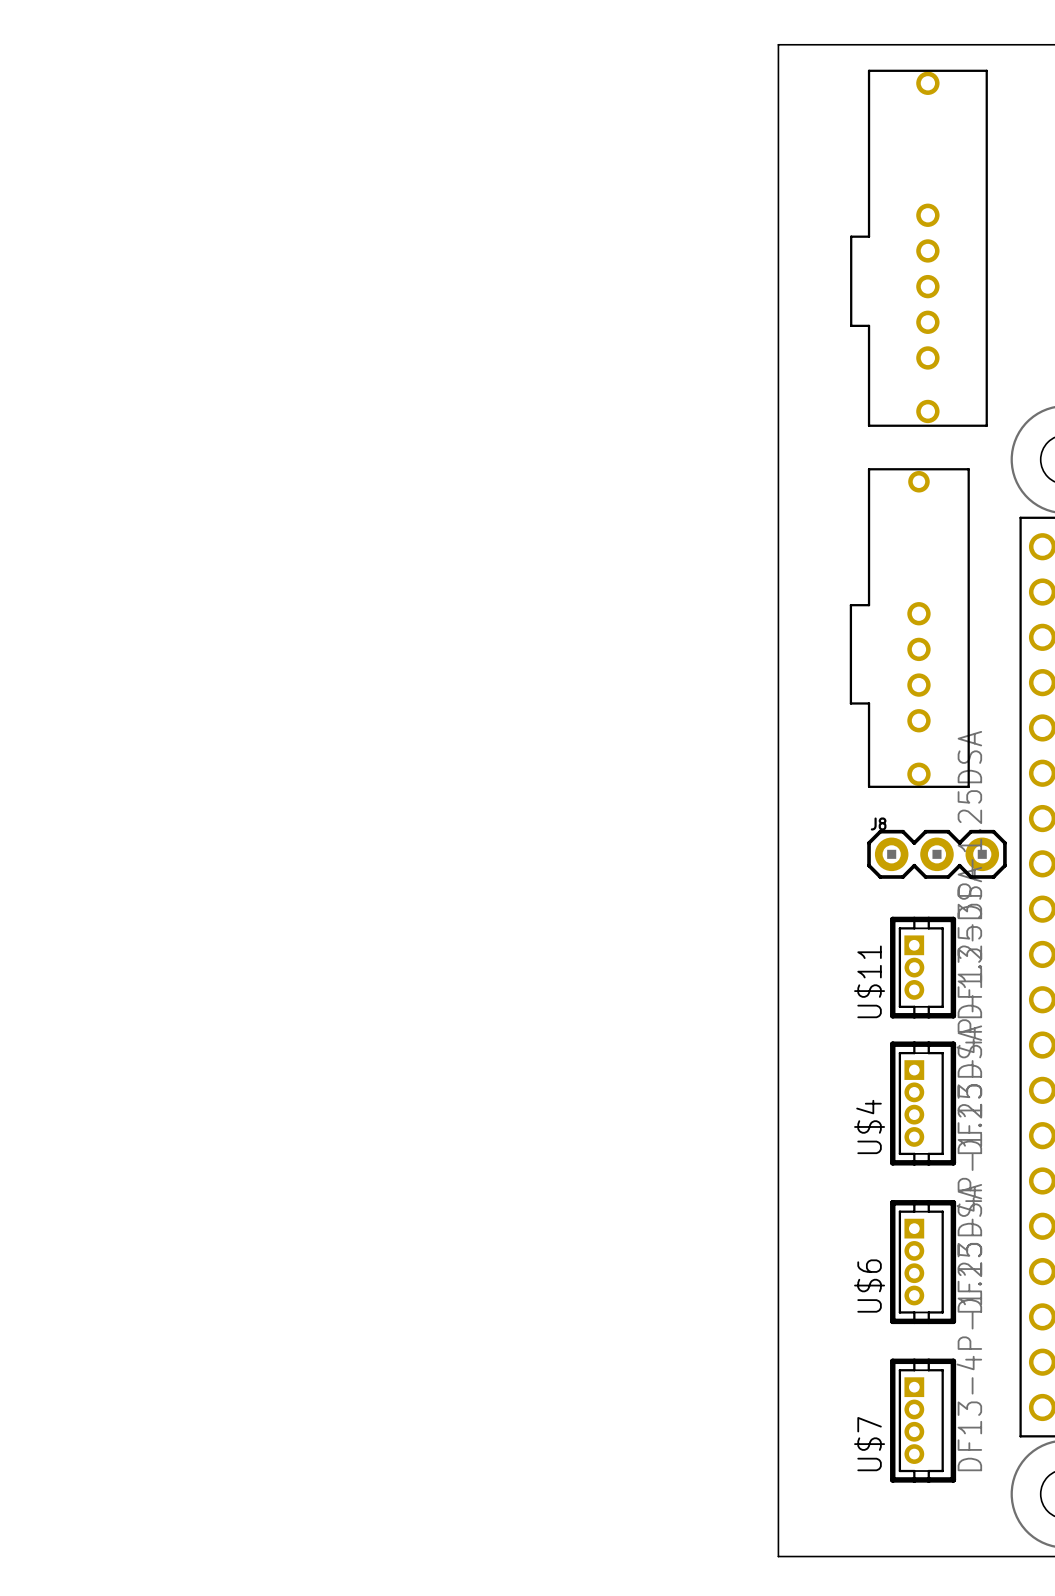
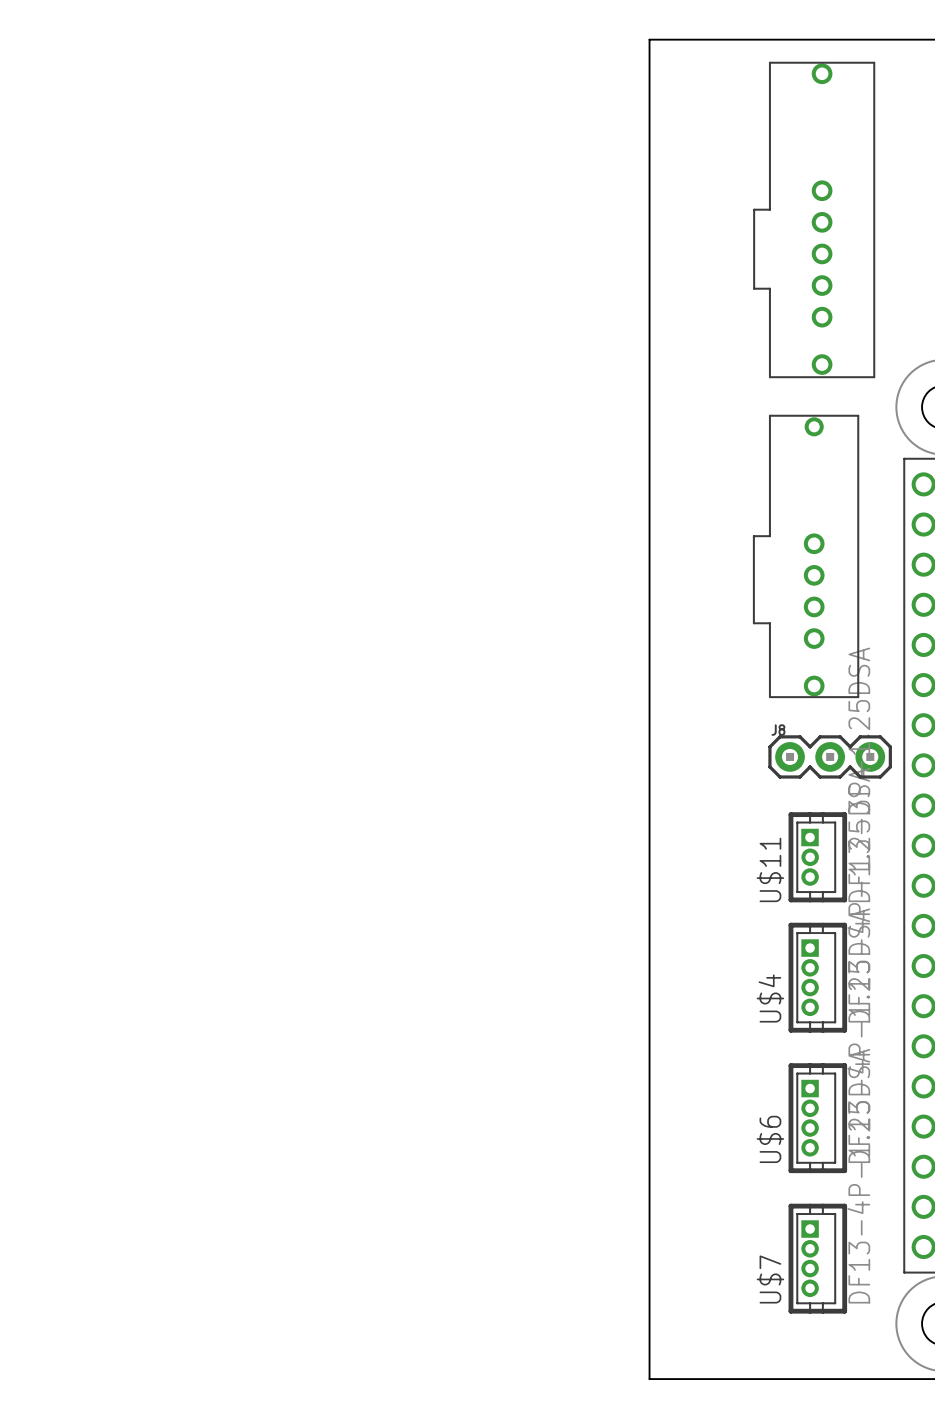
board edge: (778, 44) (778, 1556) -> (689, 39) (649, 39) (649, 1379) (689, 1379)

